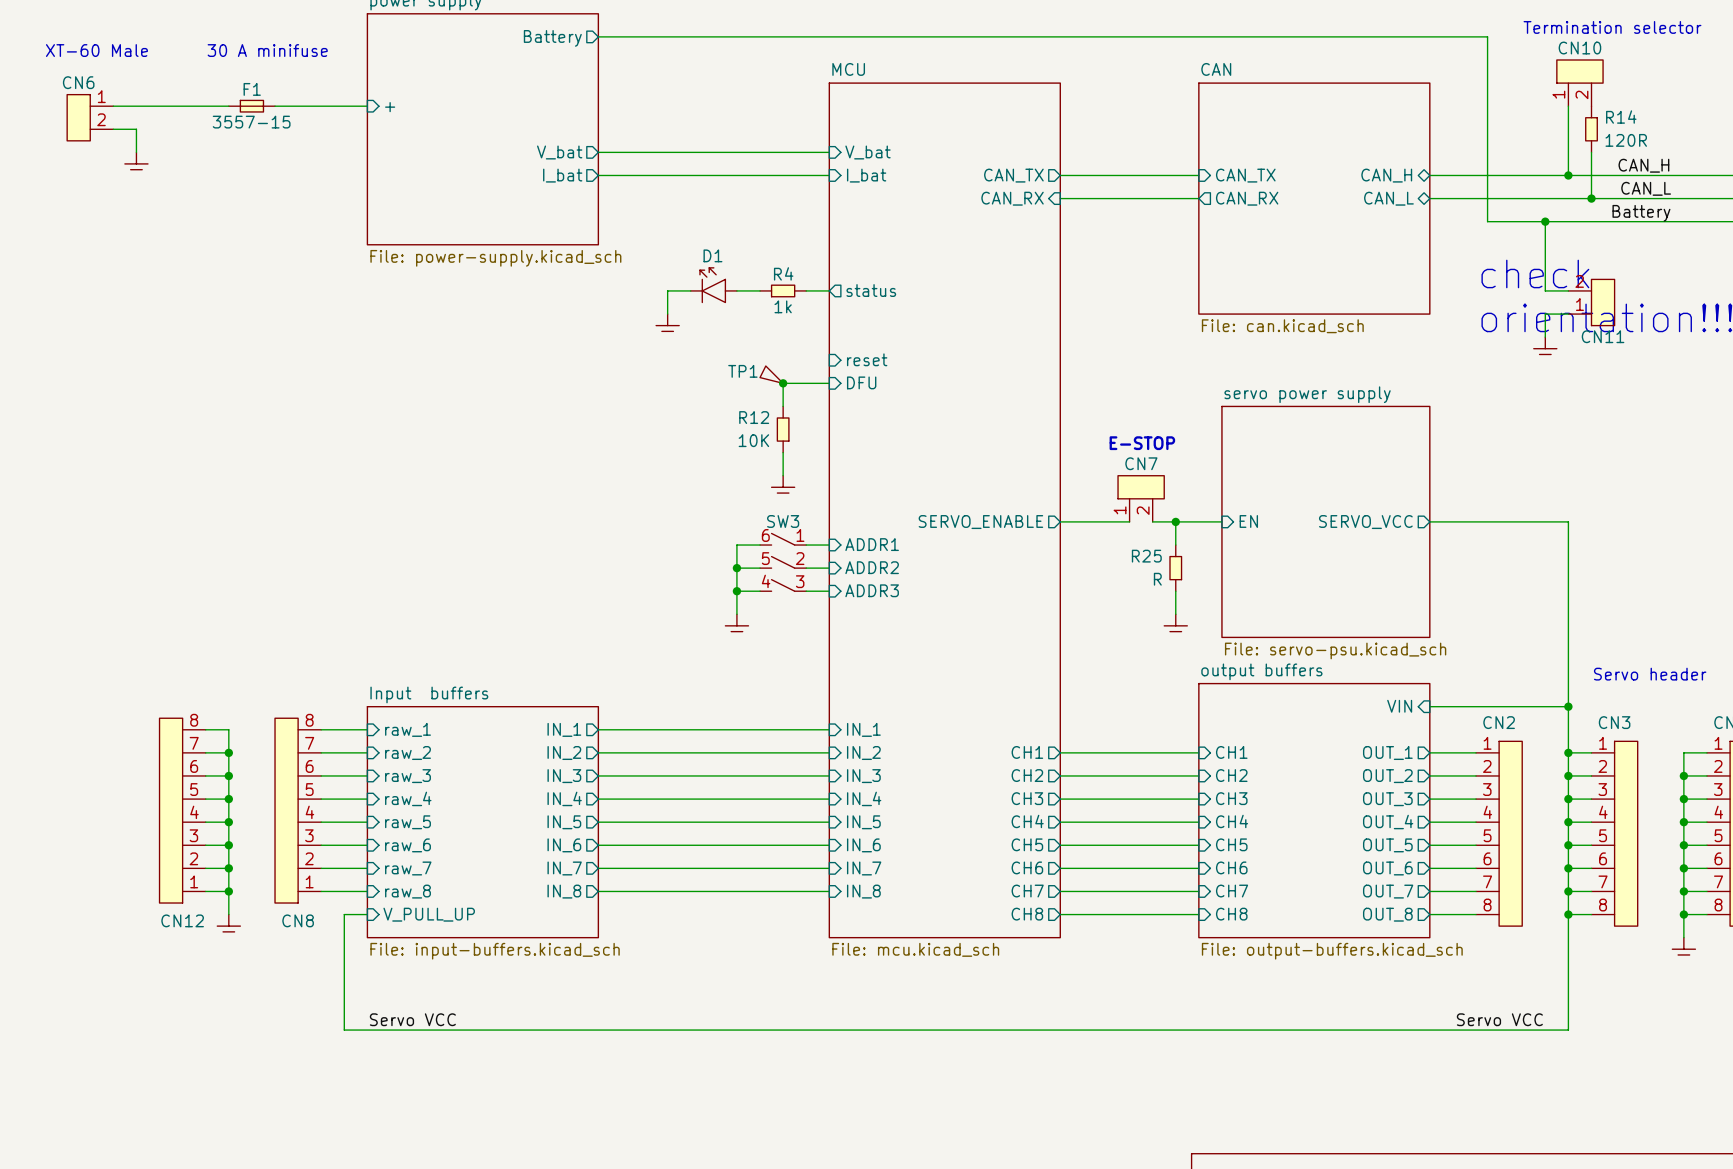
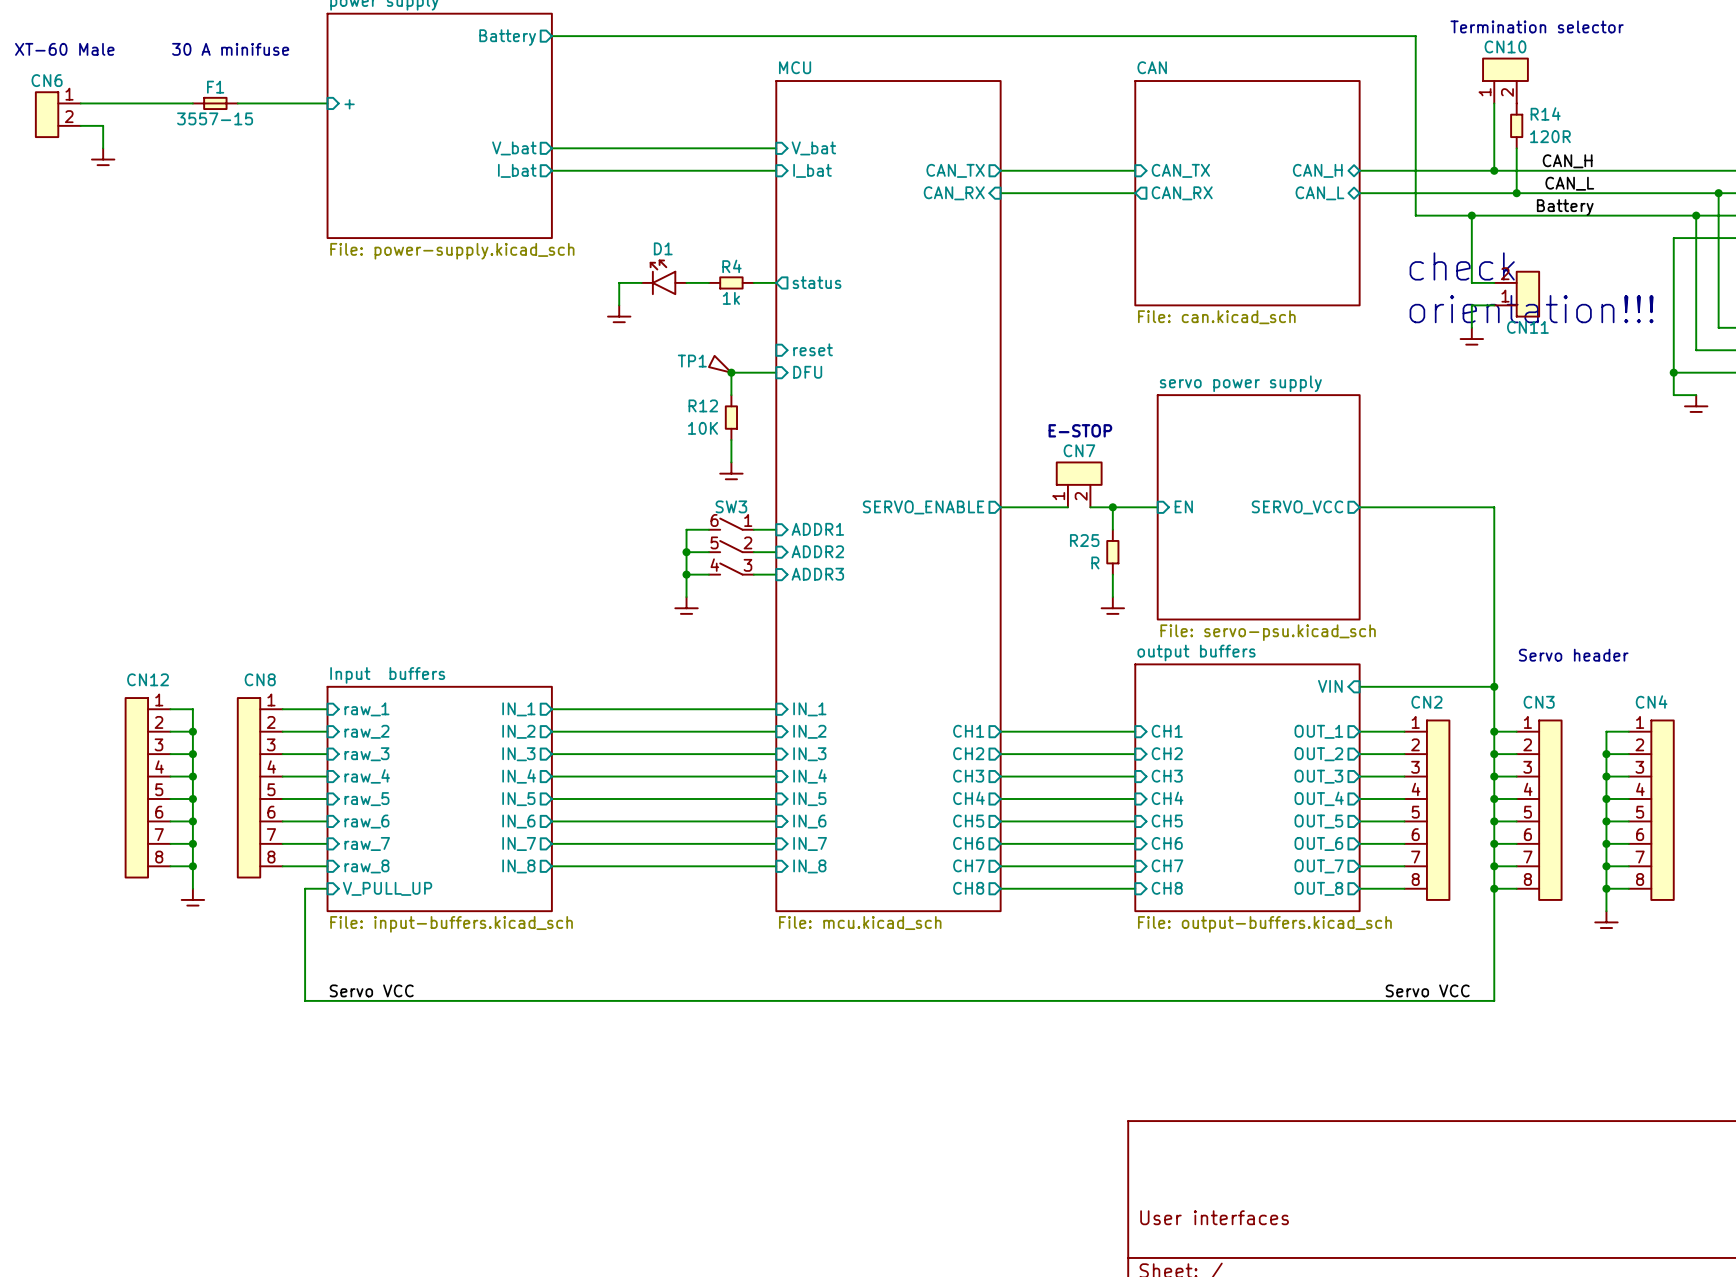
CN12 flip: as is (171, 810) -> up-down (136, 787)
CN8 flip: as is (286, 810) -> up-down (249, 787)

